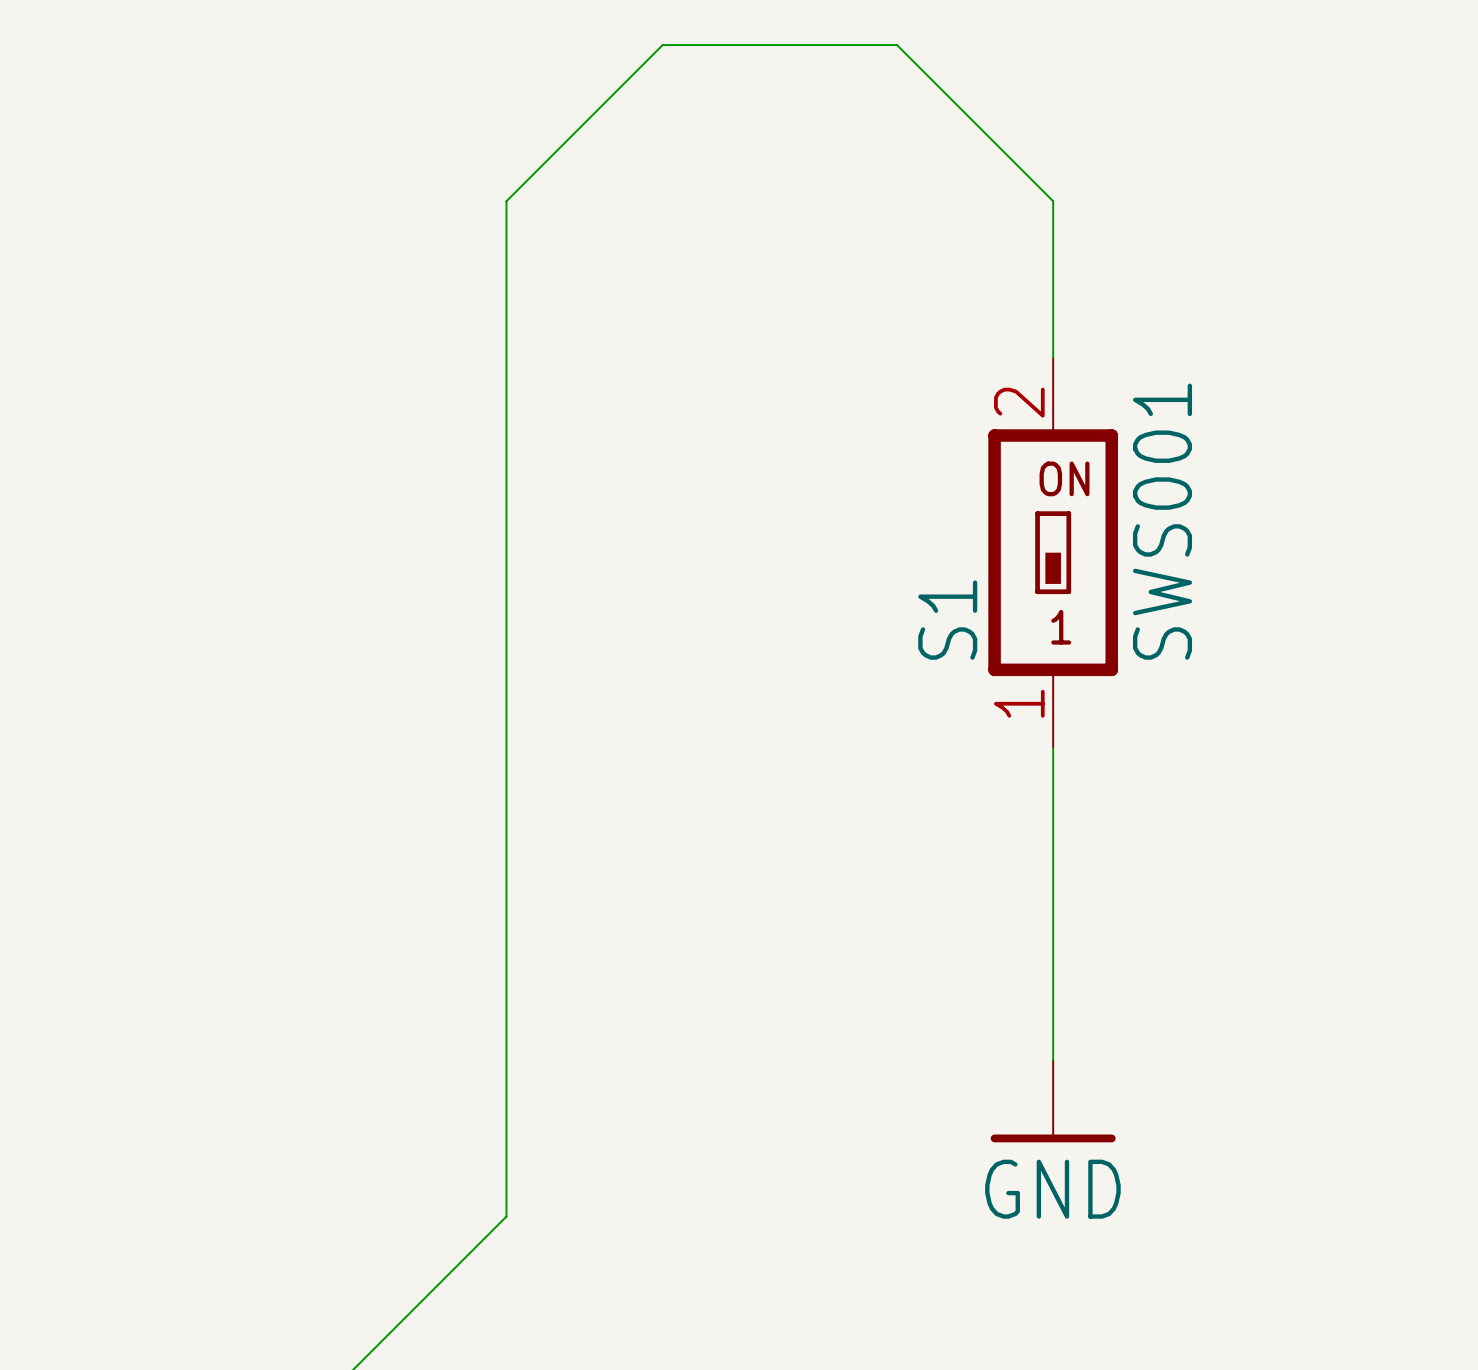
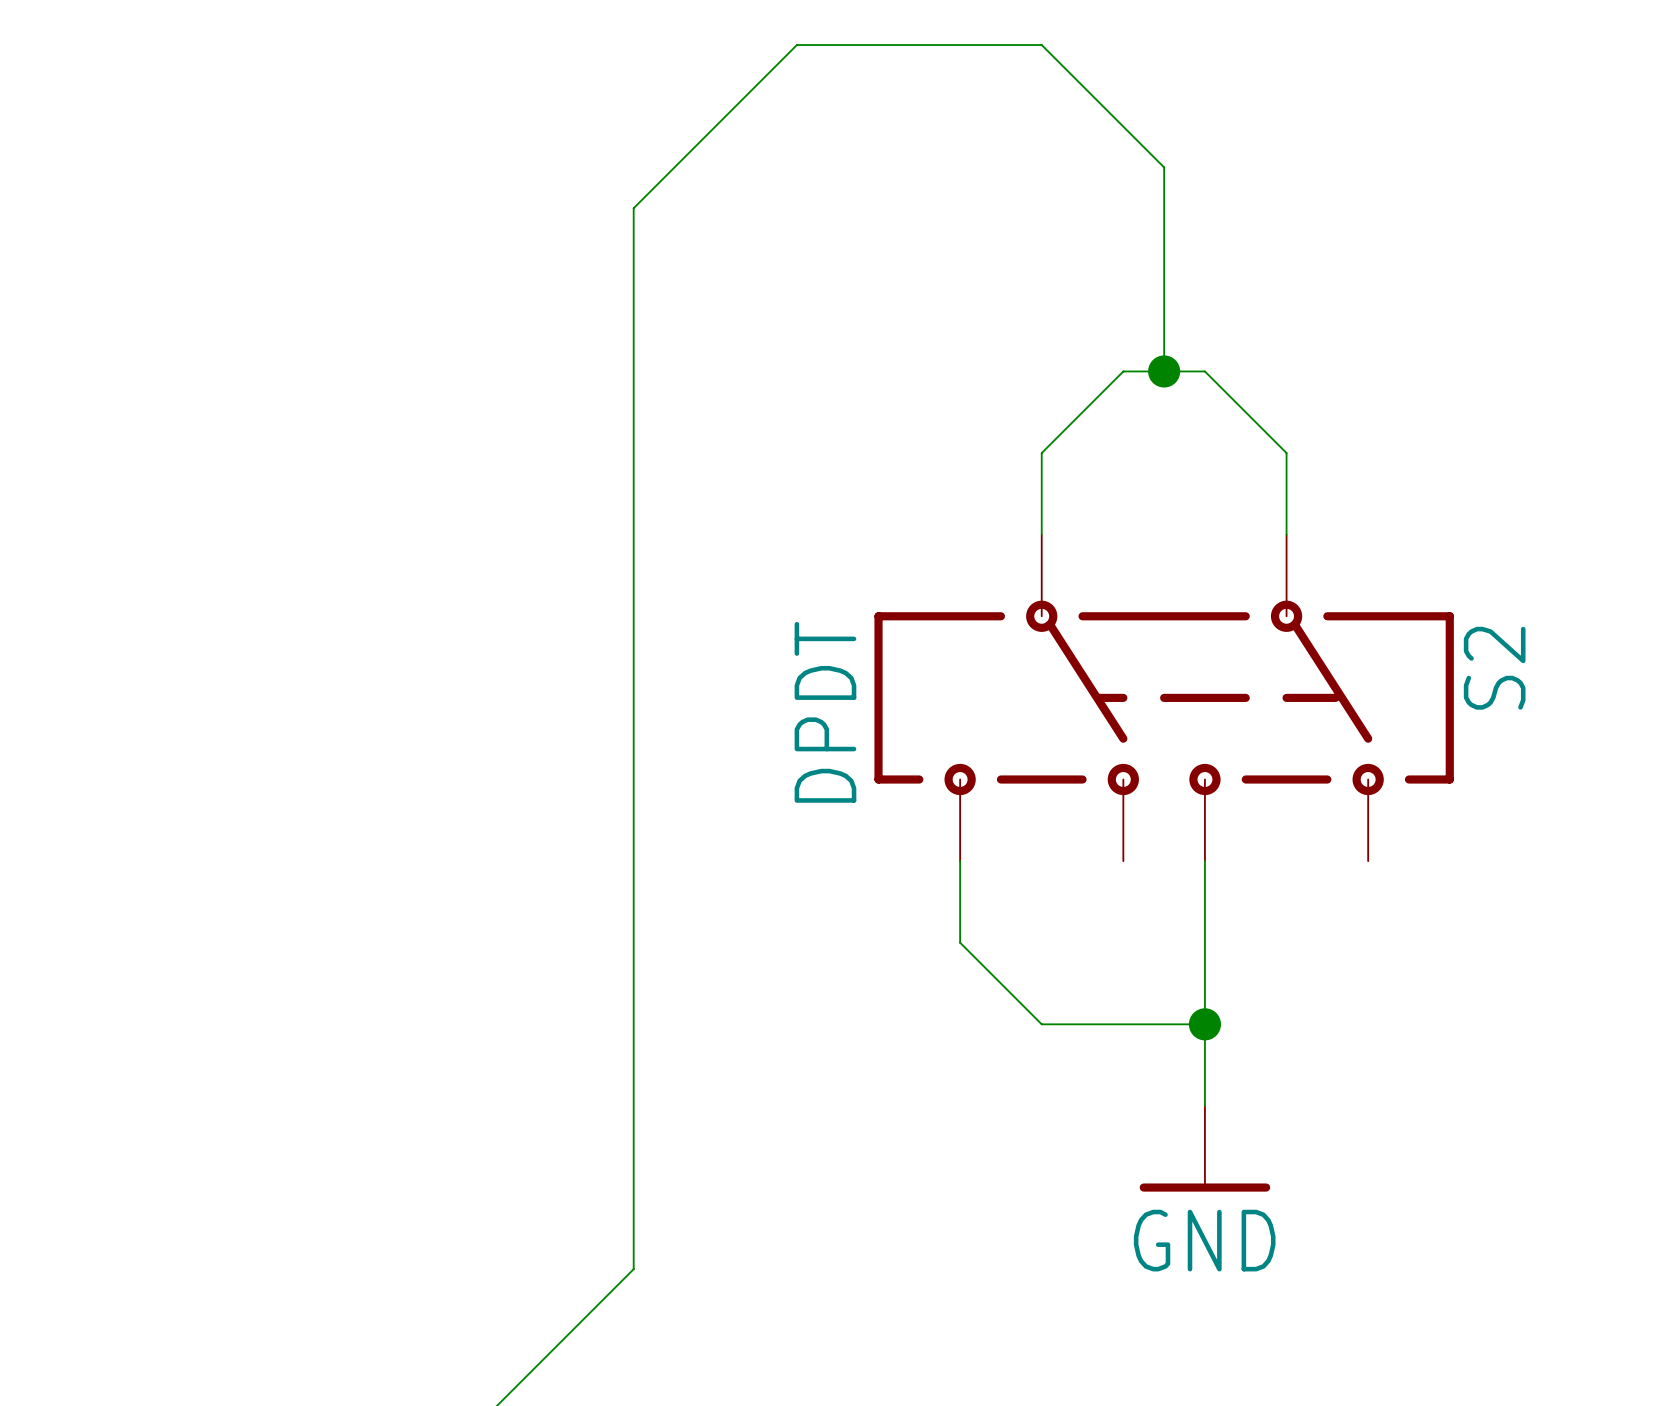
wire: (1014, 162) (1053, 201) (1053, 357) -> (1164, 167) (1164, 371)
junction: none -> (1164, 371)
wire: none -> (1041, 534) (1041, 453) (1123, 371) (1204, 371) (1286, 453) (1286, 534)
S1: SWS001 (1053, 552) -> none
S2: none -> DPDT (1164, 697)
wire: none -> (960, 861) (960, 942) (1041, 1024) (1204, 1024)
junction: none -> (1204, 1024)

